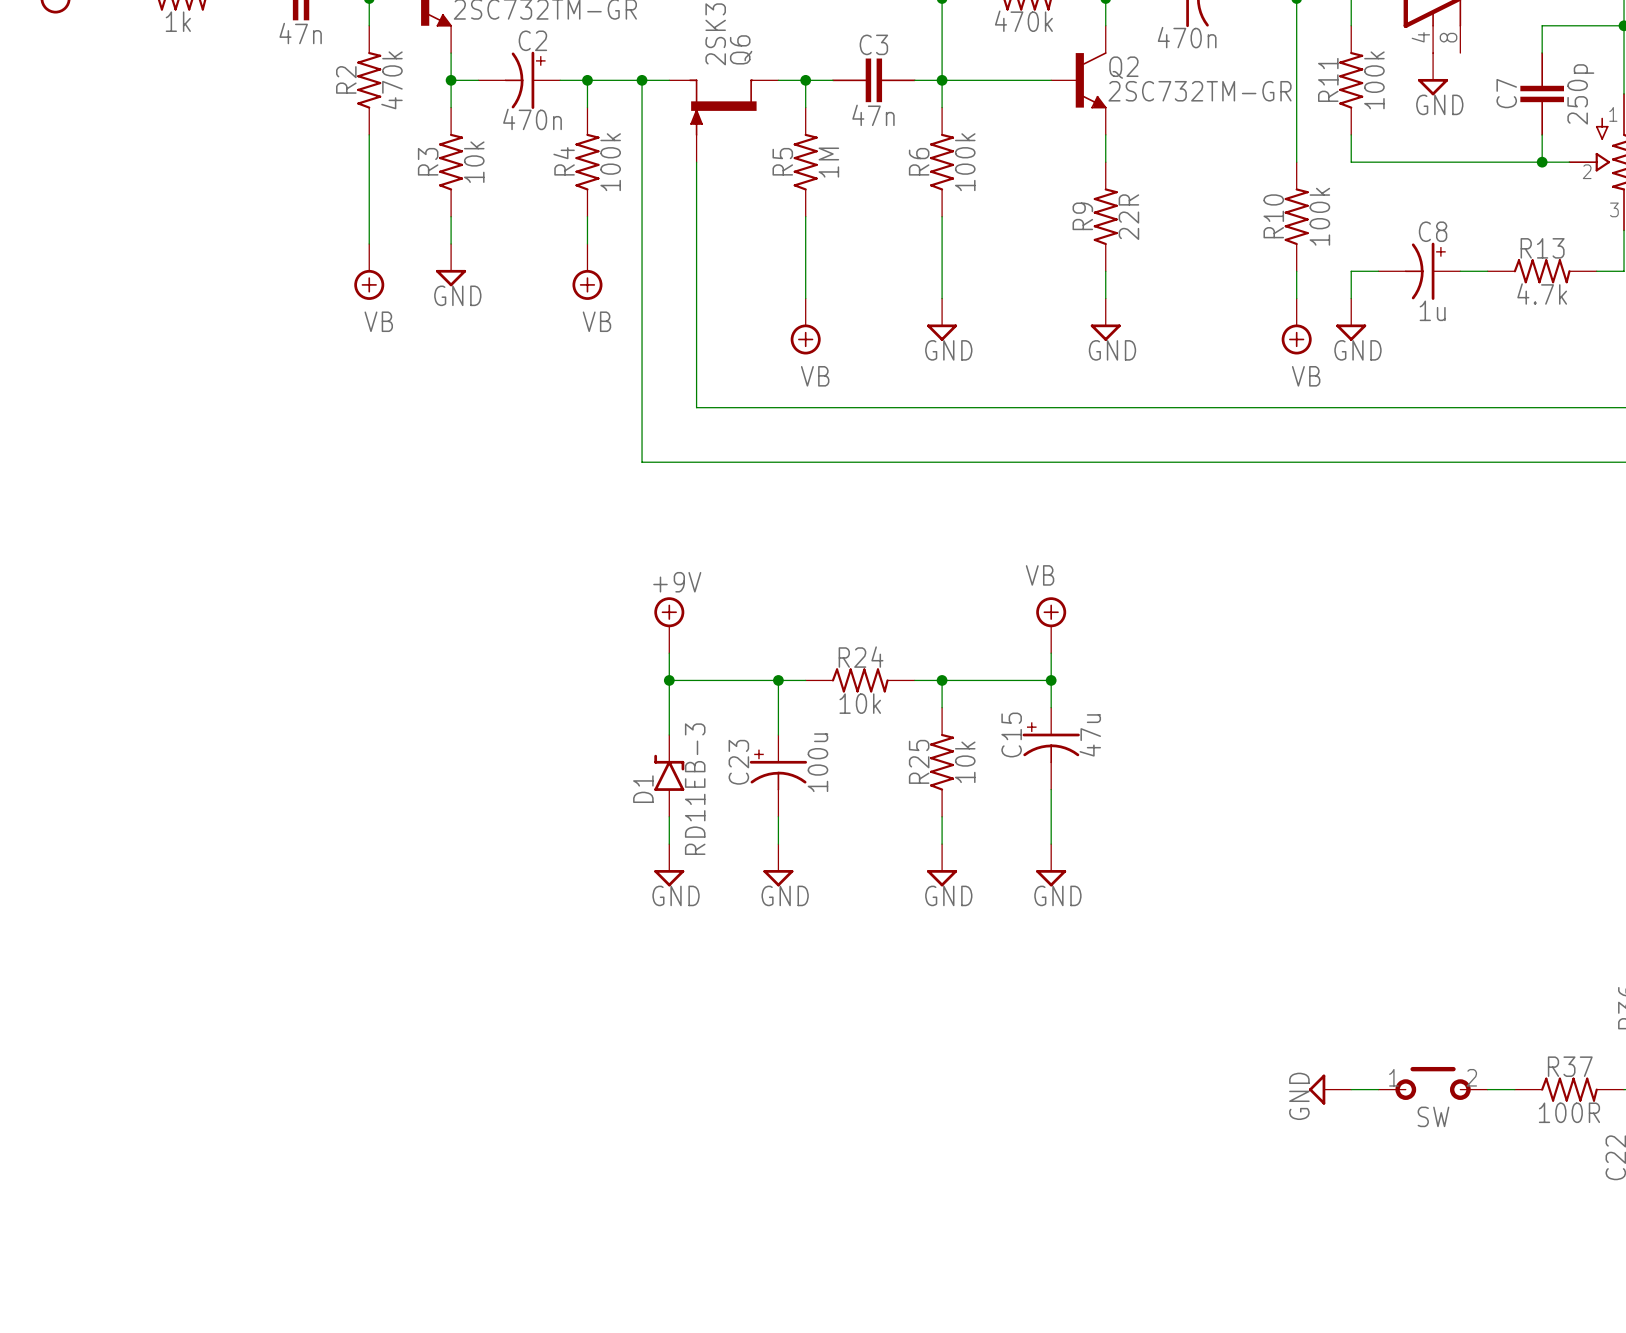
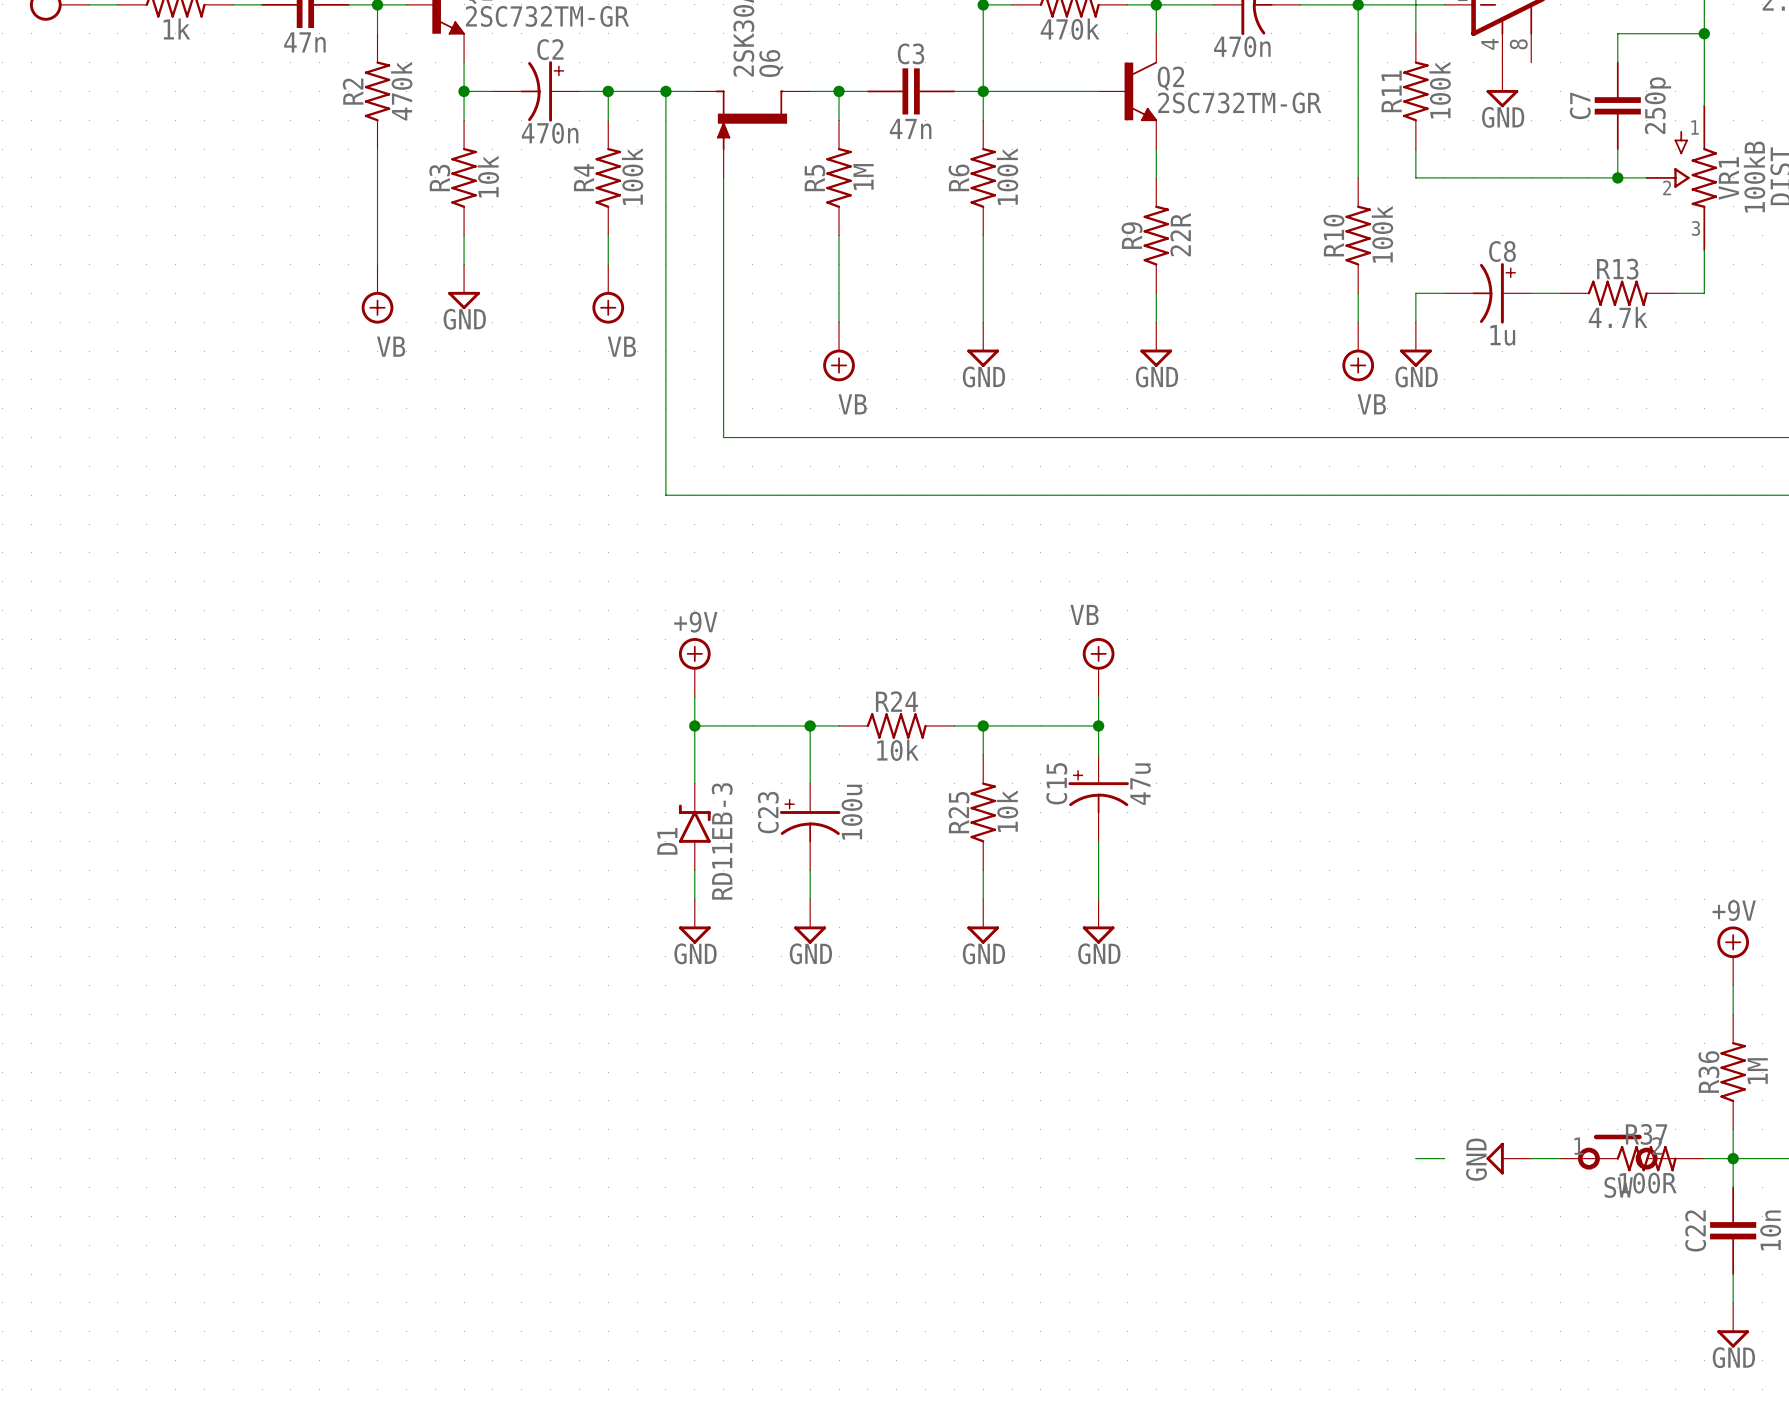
SW position: (1433, 1083) -> (1617, 1152)
power symbol position: GND (1330, 1089) -> GND (1508, 1158)

